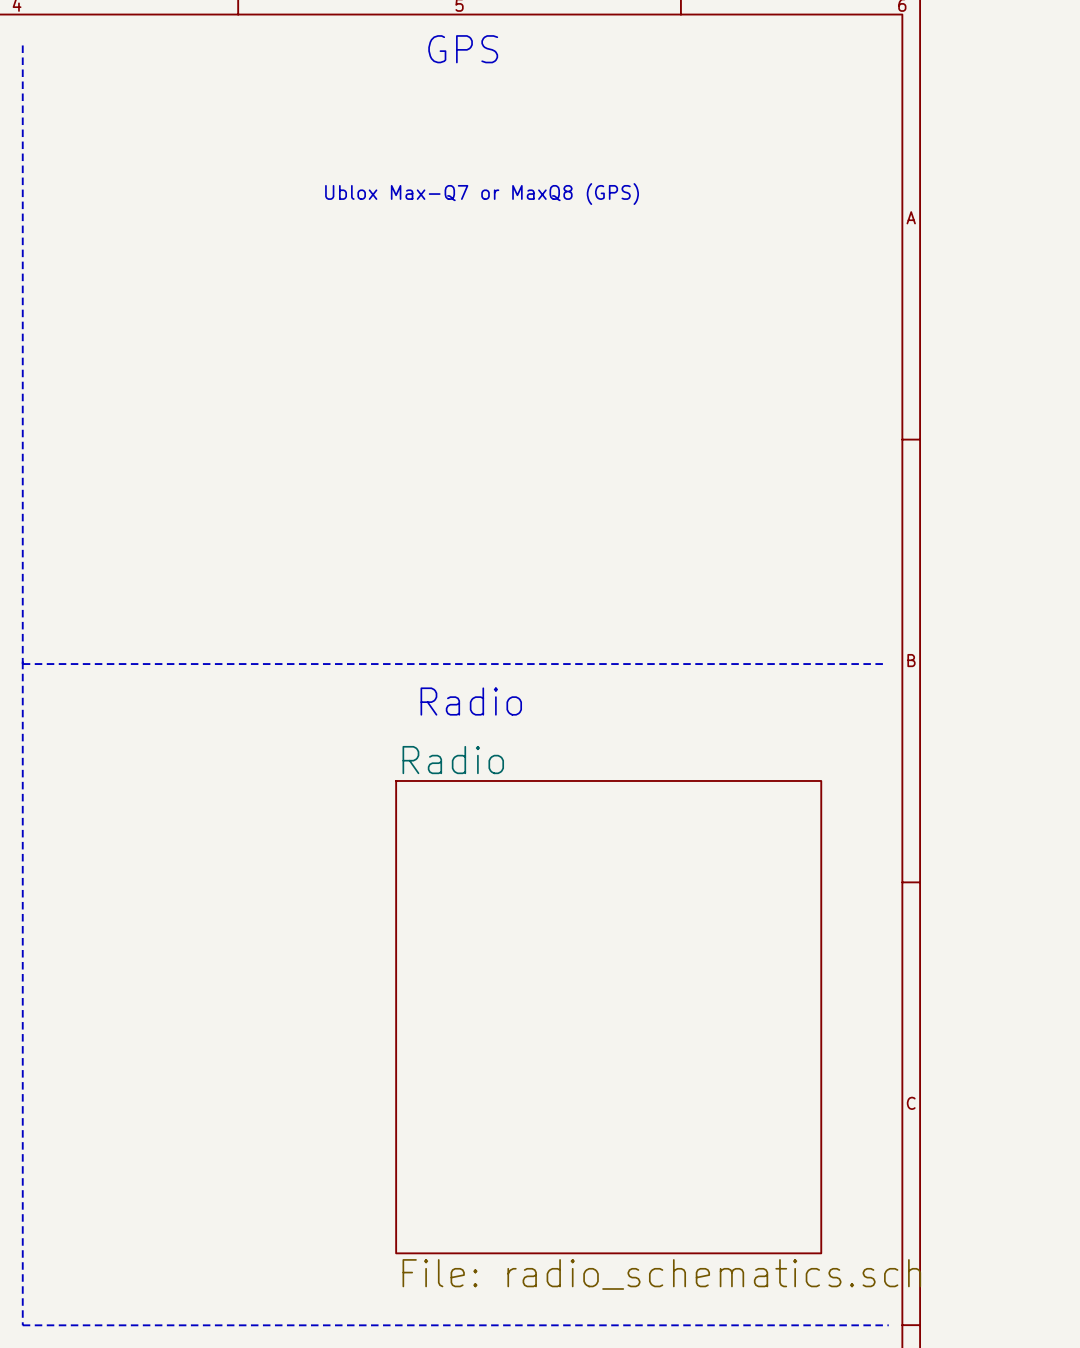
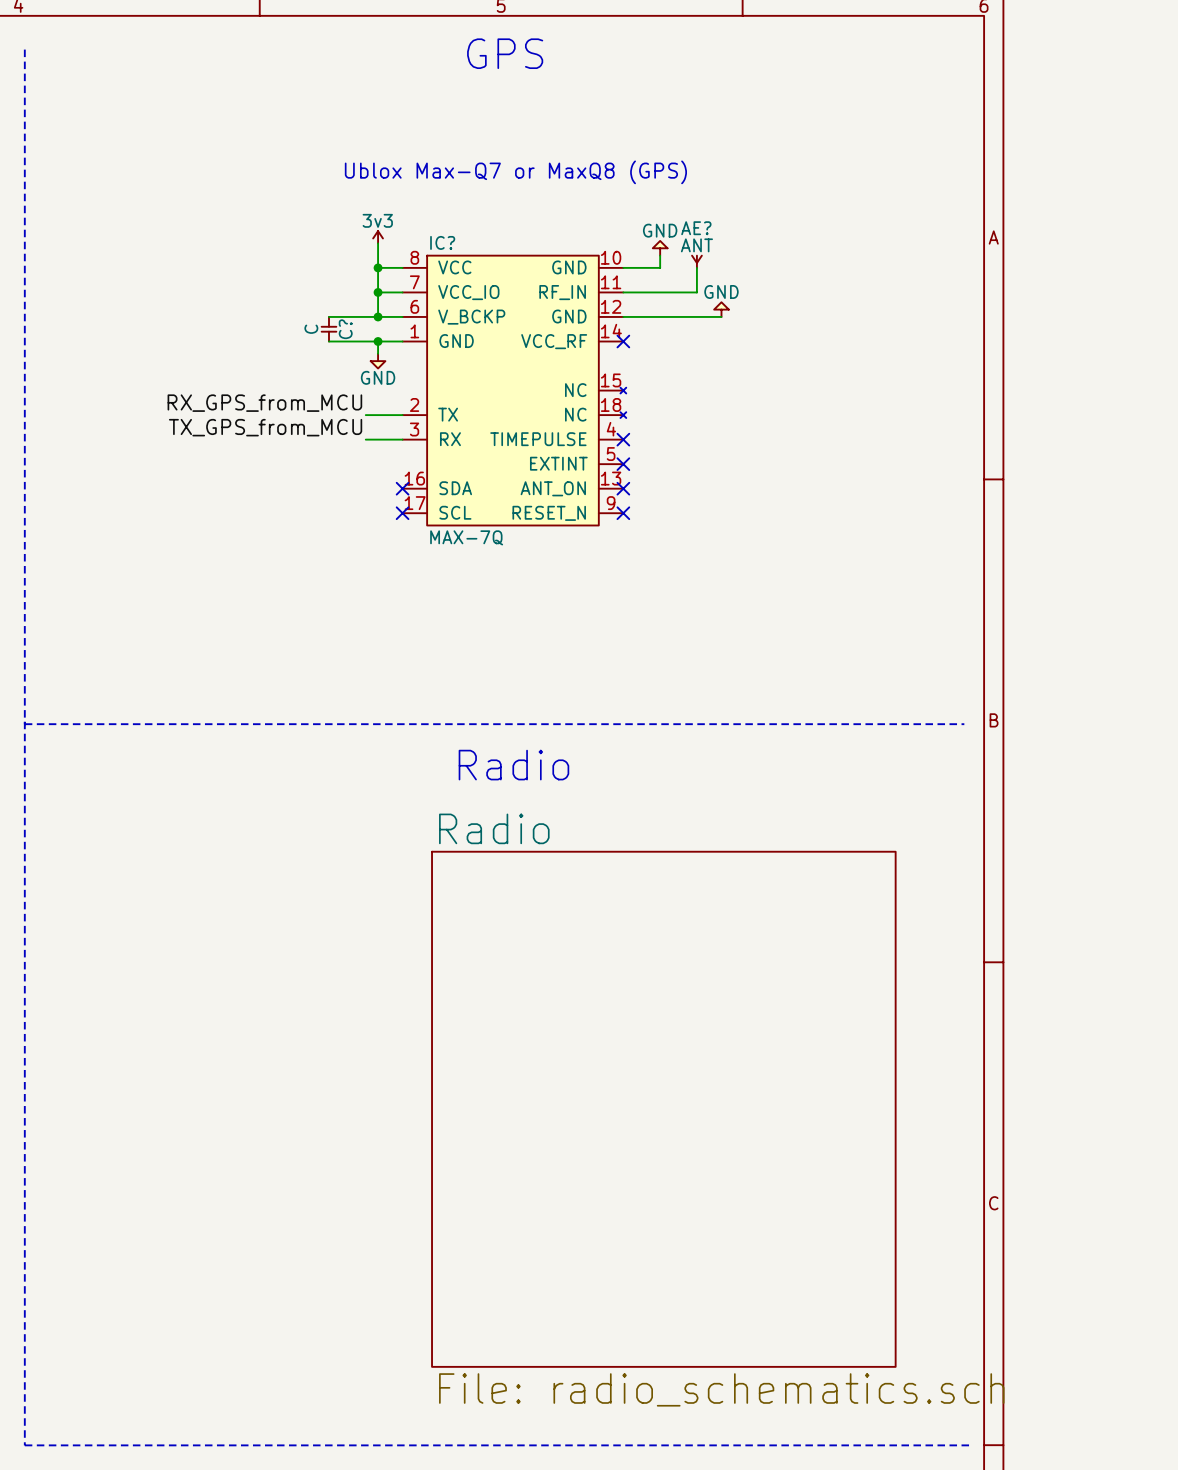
text position: Ublox Max-Q7 or MaxQ8 (GPS) (482, 194) -> Ublox Max-Q7 or MaxQ8 (GPS) (515, 172)
power symbol: none -> 3v3 (378, 237)
wire: none -> (378, 243) (378, 316)
power symbol: none -> GND (660, 248)
wire: none -> (660, 255) (660, 267) (623, 267)
AE?: none -> ANT (696, 261)
wire: none -> (378, 267) (402, 267)
junction: none -> (378, 267)
wire: none -> (696, 267) (696, 292) (623, 292)
wire: none -> (378, 292) (402, 292)
junction: none -> (378, 292)
power symbol: none -> GND (721, 309)
wire: none -> (328, 316) (402, 316)
junction: none -> (378, 316)
wire: none -> (623, 316) (721, 316)
C?: none -> C (328, 329)
wire: none -> (328, 341) (402, 341)
wire: none -> (378, 341) (378, 353)
junction: none -> (378, 341)
no-connect mark: none -> (623, 341)
power symbol: none -> GND (378, 361)
IC?: none -> MAX-7Q (514, 390)
label: none -> RX_GPS_from_MCU (264, 403)
wire: none -> (365, 415) (402, 415)
label: none -> TX_GPS_from_MCU (265, 427)
wire: none -> (365, 439) (402, 439)
no-connect mark: none -> (623, 439)
no-connect mark: none -> (623, 464)
no-connect mark: none -> (402, 488)
no-connect mark: none -> (623, 488)
no-connect mark: none -> (402, 513)
no-connect mark: none -> (623, 513)

